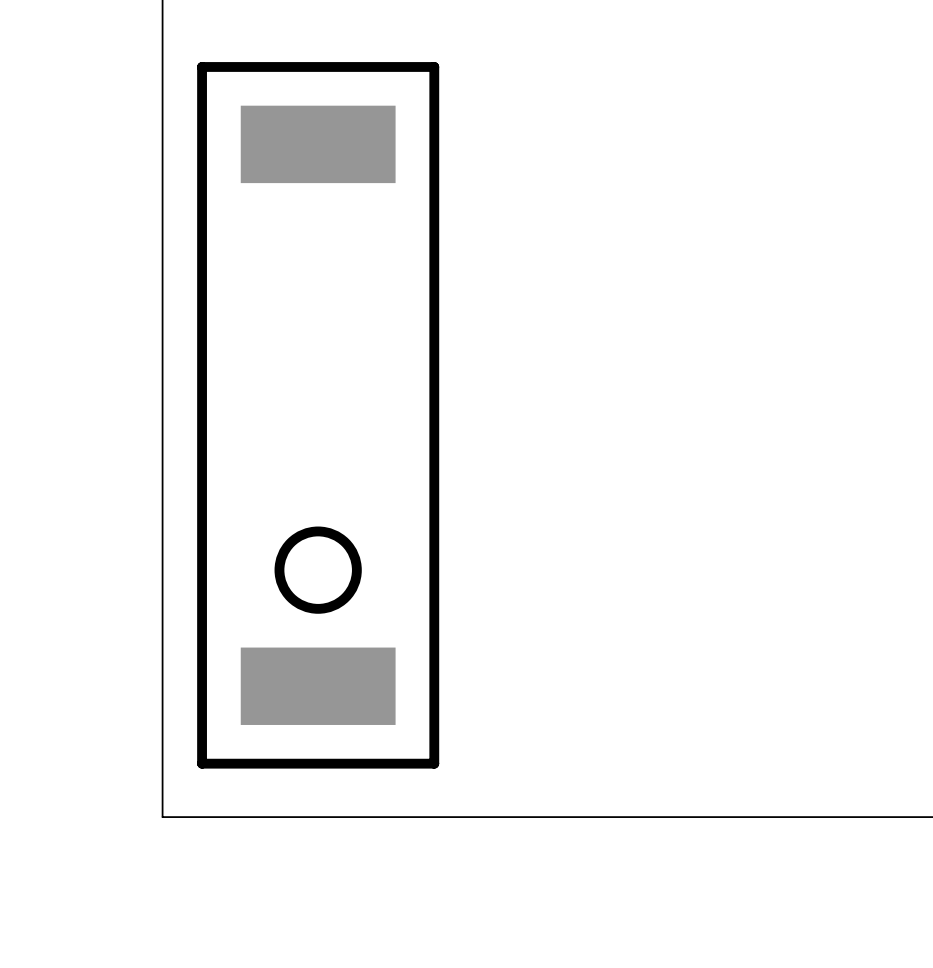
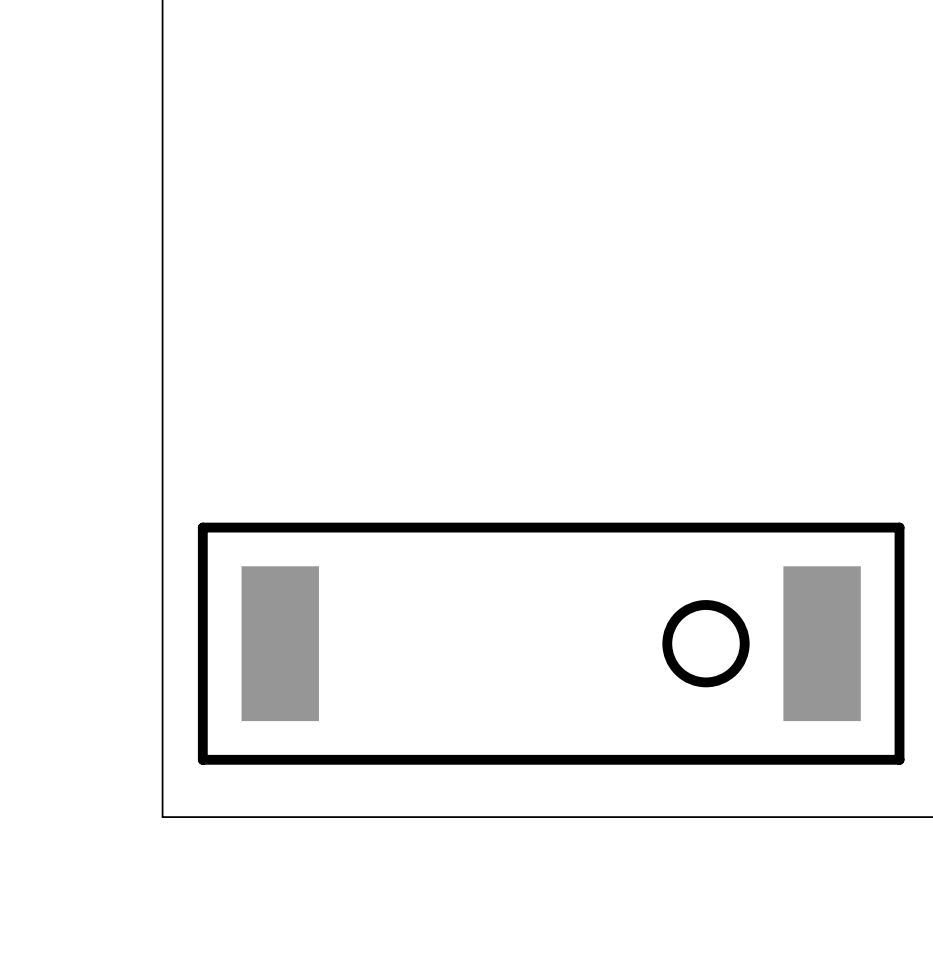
part rotation: 0° (318, 415) -> 90° counterclockwise (551, 643)

